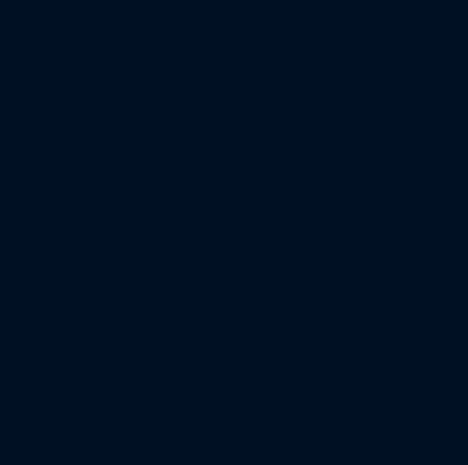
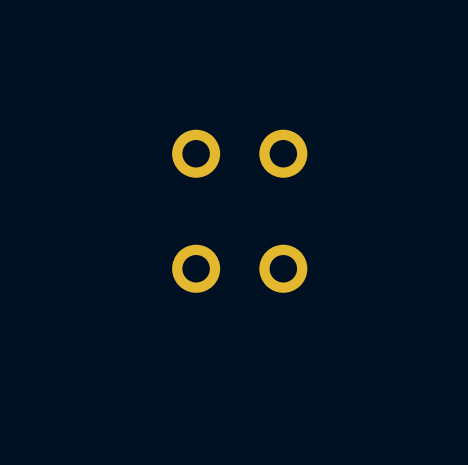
part: none -> (239, 153)
part: none -> (239, 268)

